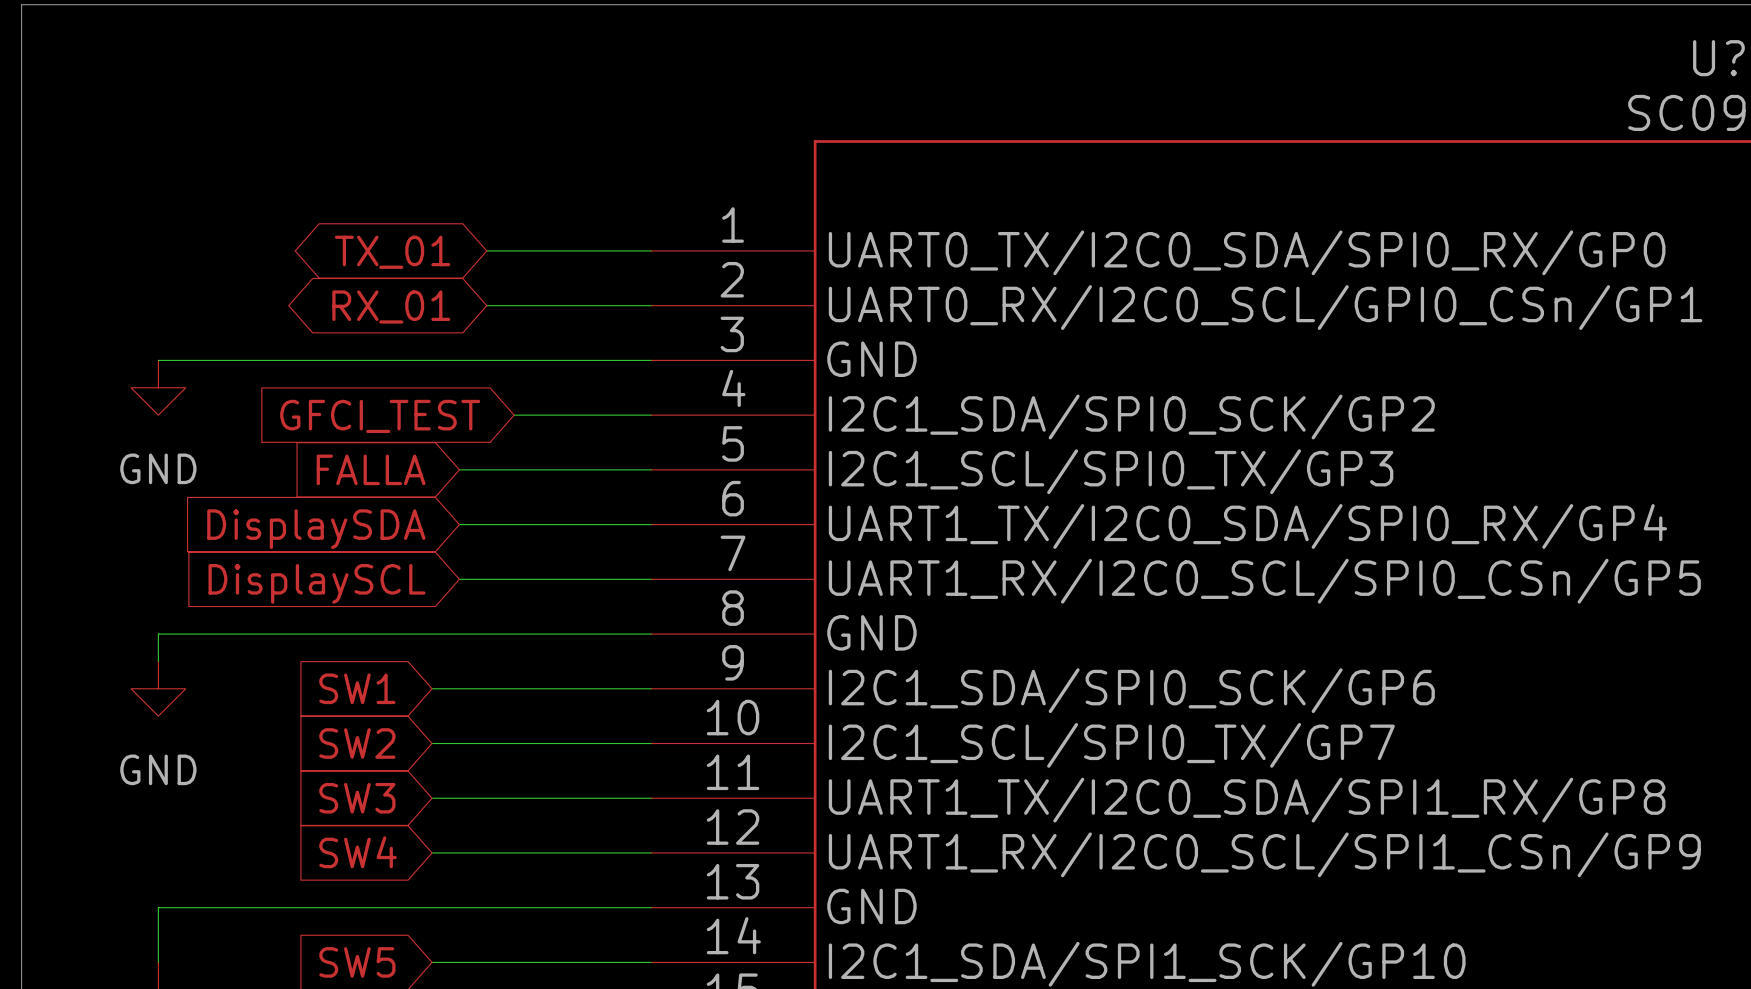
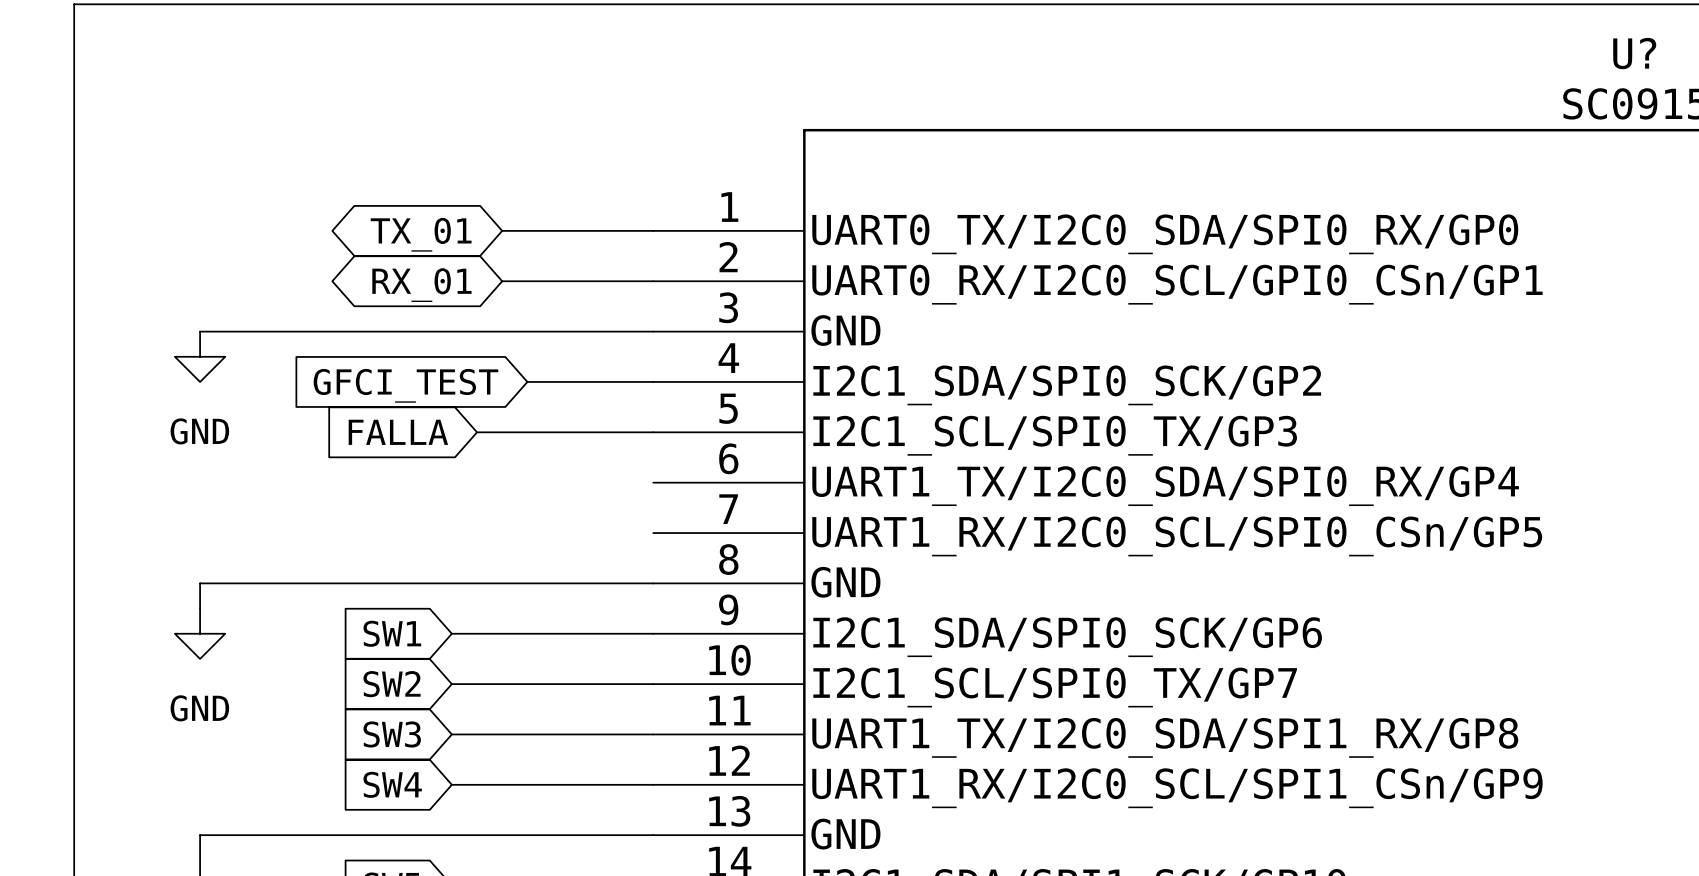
wire: (459, 524) (650, 524) -> none
global label: DisplaySDA (316, 529) -> none
wire: (459, 579) (650, 579) -> none
global label: DisplaySCL (316, 583) -> none

